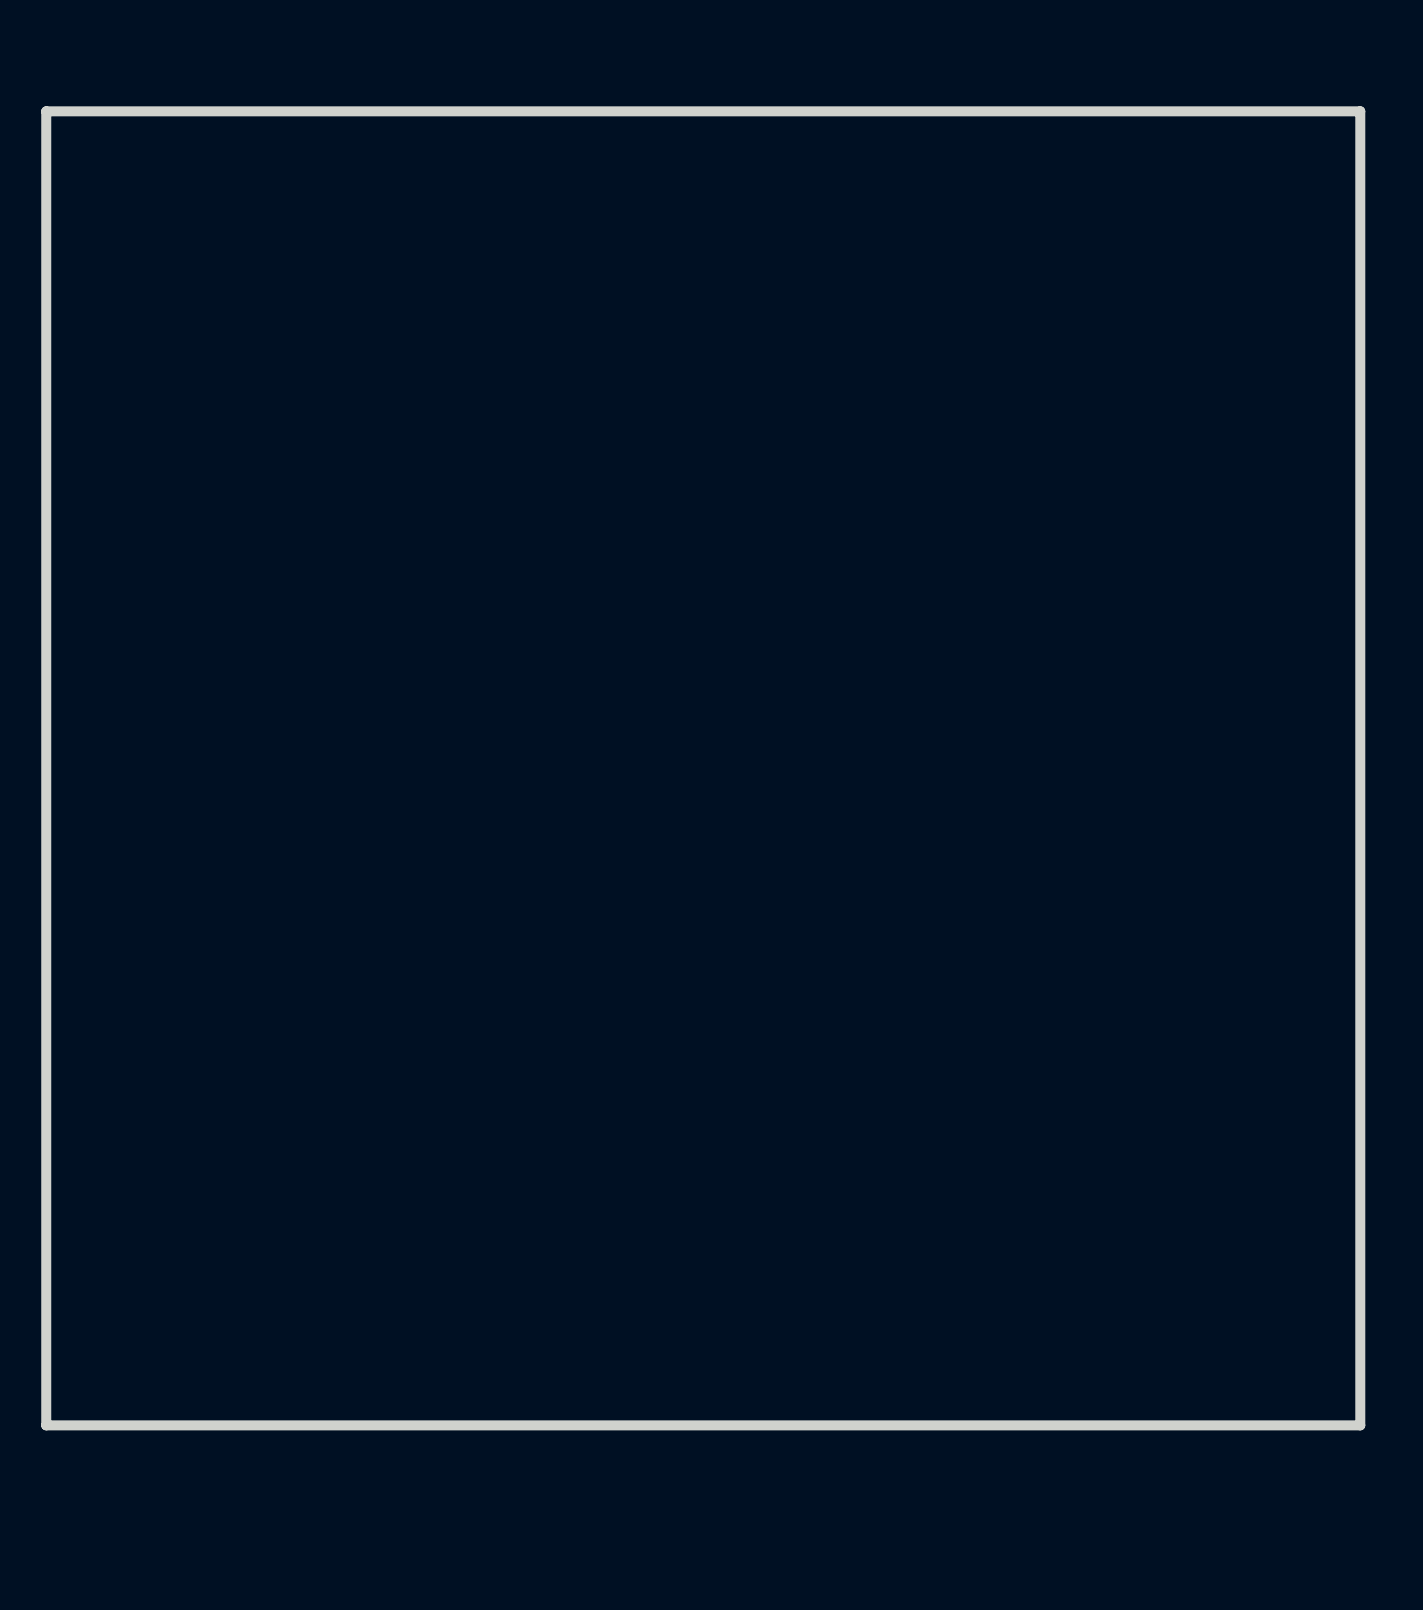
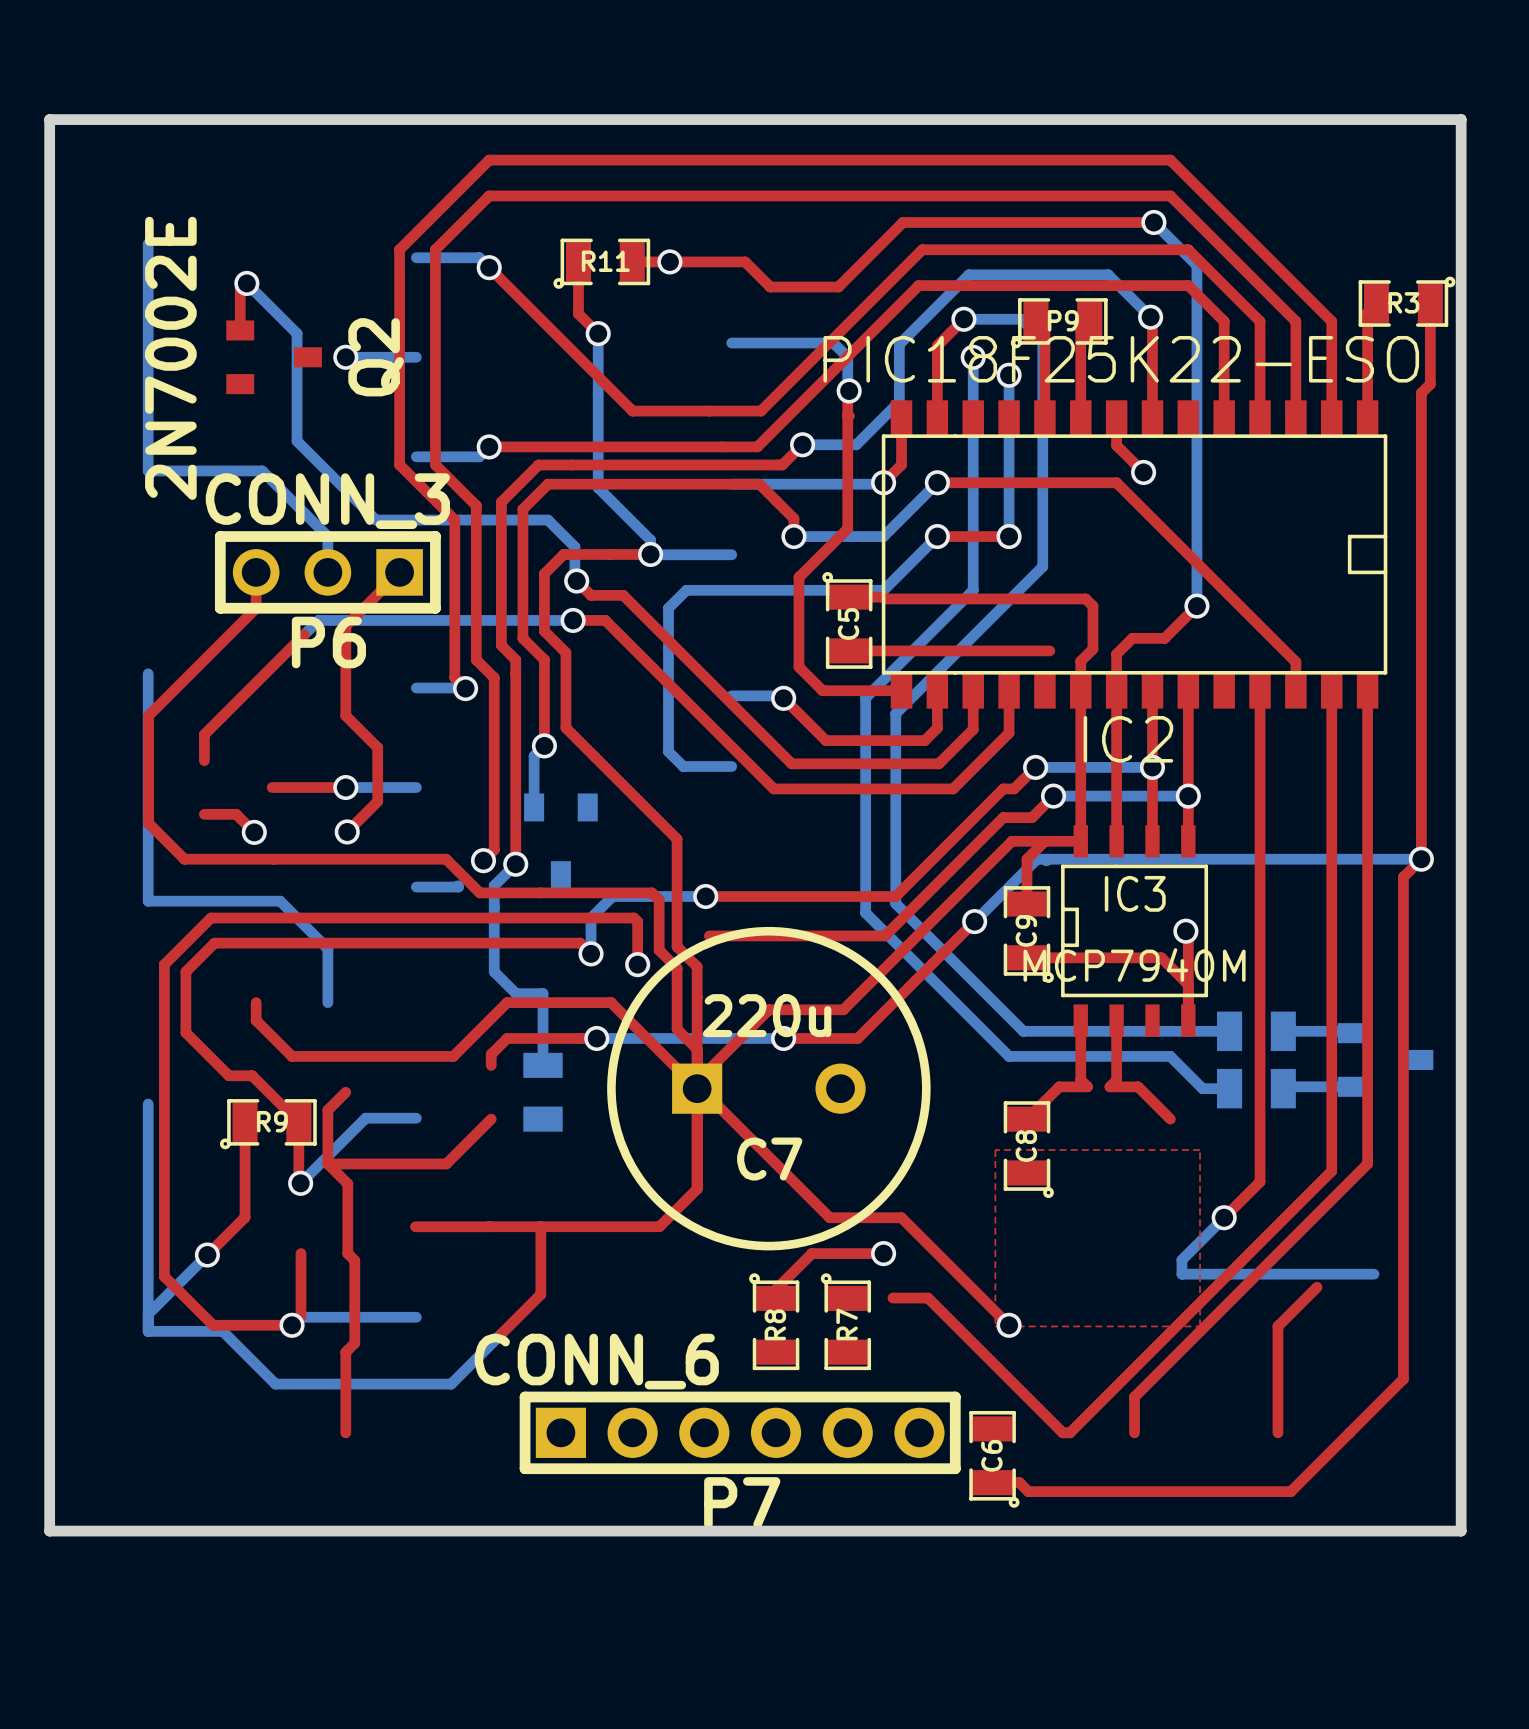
top track: none -> (1153, 222) (902, 222) (838, 287) (770, 287) (745, 261) (632, 261)
bottom track: none -> (1153, 222) (1196, 265) (1196, 606)
via: none -> (1153, 222)
bottom track: none -> (148, 243) (148, 470) (262, 470) (327, 536) (327, 572)
bottom track: none -> (416, 257) (479, 257) (489, 267)
top track: none -> (578, 261) (578, 313) (598, 333)
via: none -> (669, 261)
R11: none -> (601, 263)
top track: none -> (489, 267) (632, 411) (760, 411) (922, 249) (1188, 249) (1260, 321) (1260, 418)
via: none -> (489, 267)
top track: none -> (246, 283) (240, 290) (240, 330)
bottom track: none -> (246, 283) (297, 333) (297, 441) (375, 520) (548, 520) (574, 546) (574, 579) (576, 581)
via: none -> (246, 283)
R3: none -> (1407, 301)
top track: none -> (1376, 303) (1367, 312) (1367, 418)
top track: none -> (1430, 303) (1430, 384) (1421, 393) (1421, 859) (1403, 877) (1403, 1379) (1290, 1491) (1028, 1491) (1019, 1482) (992, 1482)
top track: none -> (1150, 317) (1152, 319) (1152, 418)
bottom track: none -> (1150, 317) (1108, 274) (968, 274) (899, 344) (899, 401) (856, 444) (802, 444)
via: none -> (1150, 317)
top track: none -> (963, 319) (937, 345) (937, 418)
bottom track: none -> (963, 319) (1021, 319) (1042, 340) (1042, 566) (895, 713) (895, 903) (1023, 1031) (1229, 1031)
via: none -> (963, 319)
top track: none -> (1035, 321) (1044, 330) (1044, 418)
top track: none -> (1089, 321) (1080, 330) (1080, 418)
P9: none -> (1059, 323)
bottom track: none -> (598, 333) (598, 487) (650, 540) (650, 554)
via: none -> (598, 333)
bottom track: none -> (731, 343) (833, 343) (847, 357) (849, 390)
Q2: none -> 2N7002E (274, 357)
bottom track: none -> (345, 357) (416, 357)
via: none -> (345, 357)
bottom track: none -> (973, 357) (973, 590) (865, 697) (865, 912) (1009, 1056) (1170, 1056) (1202, 1088) (1229, 1088)
via: none -> (973, 357)
bottom track: none -> (1009, 375) (1009, 536)
via: none -> (1009, 375)
top track: none -> (849, 390) (847, 528) (798, 577) (798, 667) (822, 690) (901, 690)
via: none -> (849, 390)
top track: none -> (901, 418) (901, 464) (883, 482)
top track: none -> (1116, 418) (1116, 445) (1143, 472)
top track: none -> (1224, 418) (1224, 321) (1188, 285) (918, 285) (757, 446) (489, 446)
top track: none -> (1295, 418) (1295, 321) (1170, 195) (489, 195) (435, 249) (435, 464) (476, 505) (476, 659) (494, 677) (494, 849) (483, 860)
top track: none -> (1331, 418) (1331, 321) (1170, 160) (489, 160) (399, 249) (399, 464) (454, 520) (454, 677) (465, 688)
top track: none -> (802, 444) (782, 464) (538, 464) (501, 502) (501, 645) (515, 659) (515, 864)
via: none -> (802, 444)
bottom track: none -> (489, 446) (479, 456) (416, 456)
via: none -> (489, 446)
via: none -> (1143, 472)
bottom track: none -> (883, 482) (731, 484)
via: none -> (883, 482)
top track: none -> (937, 482) (1116, 482) (1295, 662) (1295, 690)
bottom track: none -> (937, 482) (883, 536) (793, 536)
via: none -> (937, 482)
top track: none -> (793, 536) (793, 518) (759, 484) (548, 484) (522, 509) (522, 638) (544, 659) (544, 745)
via: none -> (793, 536)
top track: none -> (937, 536) (1009, 536)
bottom track: none -> (937, 536) (883, 590) (686, 590) (668, 608) (668, 751) (683, 766) (731, 766)
via: none -> (937, 536)
via: none -> (1009, 536)
top track: none -> (650, 554) (563, 554) (544, 573) (544, 631) (565, 652) (565, 728) (677, 839) (677, 946) (697, 966) (697, 1189) (659, 1226) (415, 1226)
bottom track: none -> (650, 554) (731, 554)
via: none -> (650, 554)
IC2: none -> PIC18F25K22-ESO (1134, 554)
top track: none -> (256, 572) (256, 608) (148, 715) (148, 823) (184, 859) (446, 859) (479, 892) (651, 892) (659, 900) (659, 950) (677, 968) (677, 1029) (697, 1049)
P6: none -> CONN_3 (327, 572)
top track: none -> (399, 572) (345, 626) (345, 715) (377, 747) (377, 801) (347, 831)
top track: none -> (576, 581) (591, 595) (623, 595) (791, 763) (938, 763) (973, 729) (973, 690)
via: none -> (576, 581)
top track: none -> (849, 597) (883, 597) (885, 598) (1085, 598) (1092, 606) (1092, 649) (1080, 661) (1080, 841) (1011, 841) (843, 1009) (768, 1009) (697, 1081)
top track: none -> (1196, 606) (1164, 638) (1132, 638) (1116, 654) (1116, 841)
via: none -> (1196, 606)
top track: none -> (573, 620) (605, 620) (773, 788) (953, 788) (1009, 733) (1009, 690)
bottom track: none -> (573, 620) (318, 620) (304, 634)
via: none -> (573, 620)
C5: none -> (847, 620)
top track: none -> (304, 634) (204, 734) (204, 760)
top track: none -> (849, 650) (1049, 650)
bottom track: none -> (148, 673) (148, 901) (280, 901) (327, 948) (327, 1002)
bottom track: none -> (416, 687) (465, 688)
via: none -> (465, 688)
top track: none -> (937, 690) (937, 728) (924, 740) (825, 740) (783, 698)
top track: none -> (1152, 690) (1152, 841)
top track: none -> (1188, 690) (1188, 841)
top track: none -> (1260, 690) (1260, 1181) (1224, 1217)
top track: none -> (1331, 690) (1331, 1171) (1070, 1432) (1062, 1432) (928, 1298) (892, 1298)
top track: none -> (1367, 690) (1367, 1163) (1134, 1396) (1134, 1432)
bottom track: none -> (731, 695) (781, 695) (783, 698)
via: none -> (783, 698)
bottom track: none -> (544, 745) (534, 756) (534, 807)
via: none -> (544, 745)
top track: none -> (1035, 767) (1014, 788) (1003, 788) (895, 896) (705, 896)
bottom track: none -> (1035, 767) (1152, 767)
via: none -> (1035, 767)
via: none -> (1152, 767)
top track: none -> (272, 787) (345, 787)
bottom track: none -> (345, 787) (416, 787)
via: none -> (345, 787)
top track: none -> (1053, 796) (1032, 817) (1003, 817) (885, 935) (709, 935)
bottom track: none -> (1053, 796) (1188, 796)
via: none -> (1053, 796)
via: none -> (1188, 796)
top track: none -> (204, 814) (236, 814) (254, 832)
via: none -> (254, 832)
via: none -> (347, 831)
part: none -> (560, 841)
top track: none -> (1044, 841) (1027, 859) (1027, 904)
bottom track: none -> (1421, 859) (1037, 859) (974, 921)
via: none -> (1421, 859)
via: none -> (483, 860)
bottom track: none -> (515, 864) (494, 885) (494, 971) (516, 993) (542, 993) (542, 1065)
via: none -> (515, 864)
bottom track: none -> (458, 885) (416, 887)
bottom track: none -> (705, 896) (612, 896) (591, 918) (591, 953)
via: none -> (705, 896)
top track: none -> (974, 921) (857, 1038) (783, 1038)
via: none -> (974, 921)
IC3: none -> MCP7940M (1134, 930)
top track: none -> (1185, 931) (1188, 933) (1188, 1020)
via: none -> (1185, 931)
C9: none -> (1028, 934)
top track: none -> (591, 953) (580, 943) (214, 943) (185, 971) (185, 1032) (228, 1075) (252, 1075) (298, 1122) (298, 1181) (300, 1183)
via: none -> (591, 953)
top track: none -> (1027, 957) (1161, 957) (1188, 984)
top track: none -> (637, 964) (637, 921) (634, 918) (211, 918) (164, 964) (164, 1276) (213, 1325) (292, 1325) (300, 1316) (300, 1253)
via: none -> (637, 964)
top track: none -> (256, 1002) (256, 1020) (292, 1056) (453, 1056) (507, 1002) (611, 1002) (697, 1088) (700, 1088) (829, 1217) (901, 1217) (1009, 1325)
top track: none -> (1080, 1020) (1080, 1080) (1087, 1086) (1059, 1086) (1027, 1119)
top track: none -> (1116, 1020) (1116, 1080) (1109, 1086) (1138, 1086) (1170, 1119)
part: none -> (1256, 1031)
bottom track: none -> (1283, 1031) (1349, 1031) (1351, 1033)
top track: none -> (596, 1038) (507, 1038) (491, 1054) (491, 1065)
bottom track: none -> (596, 1038) (783, 1038)
via: none -> (596, 1038)
via: none -> (783, 1038)
part: none -> (1385, 1059)
bottom track: none -> (1351, 1086) (1285, 1086) (1283, 1088)
C7: none -> 220u (768, 1088)
part: none -> (1256, 1088)
top track: none -> (345, 1092) (327, 1110) (327, 1163)
part: none -> (542, 1092)
bottom track: none -> (148, 1104) (148, 1331) (222, 1331) (275, 1384) (451, 1384) (501, 1333)
bottom track: none -> (416, 1118) (365, 1118) (300, 1183)
top track: none -> (491, 1119) (446, 1163) (327, 1163)
top track: none -> (245, 1122) (245, 1217) (207, 1255)
R9: none -> (268, 1124)
top zone outline: none -> (995, 1149) (1200, 1149) (1200, 1326) (995, 1326) (995, 1149)
C8: none -> (1028, 1149)
top track: none -> (327, 1163) (347, 1183) (347, 1253) (354, 1260) (354, 1343) (345, 1352) (345, 1432)
via: none -> (300, 1183)
bottom track: none -> (1224, 1217) (1181, 1259) (1181, 1274) (1373, 1274)
via: none -> (1224, 1217)
top track: none -> (540, 1226) (540, 1294) (501, 1333)
top track: none -> (883, 1253) (811, 1253) (776, 1289) (776, 1298)
via: none -> (883, 1253)
bottom track: none -> (207, 1255) (148, 1314)
via: none -> (207, 1255)
top track: none -> (1317, 1287) (1277, 1326) (1277, 1432)
bottom track: none -> (416, 1317) (300, 1317) (292, 1325)
R8: none -> (774, 1321)
R7: none -> (845, 1321)
via: none -> (292, 1325)
via: none -> (1009, 1325)
P7: none -> CONN_6 (740, 1432)
C6: none -> (994, 1459)

